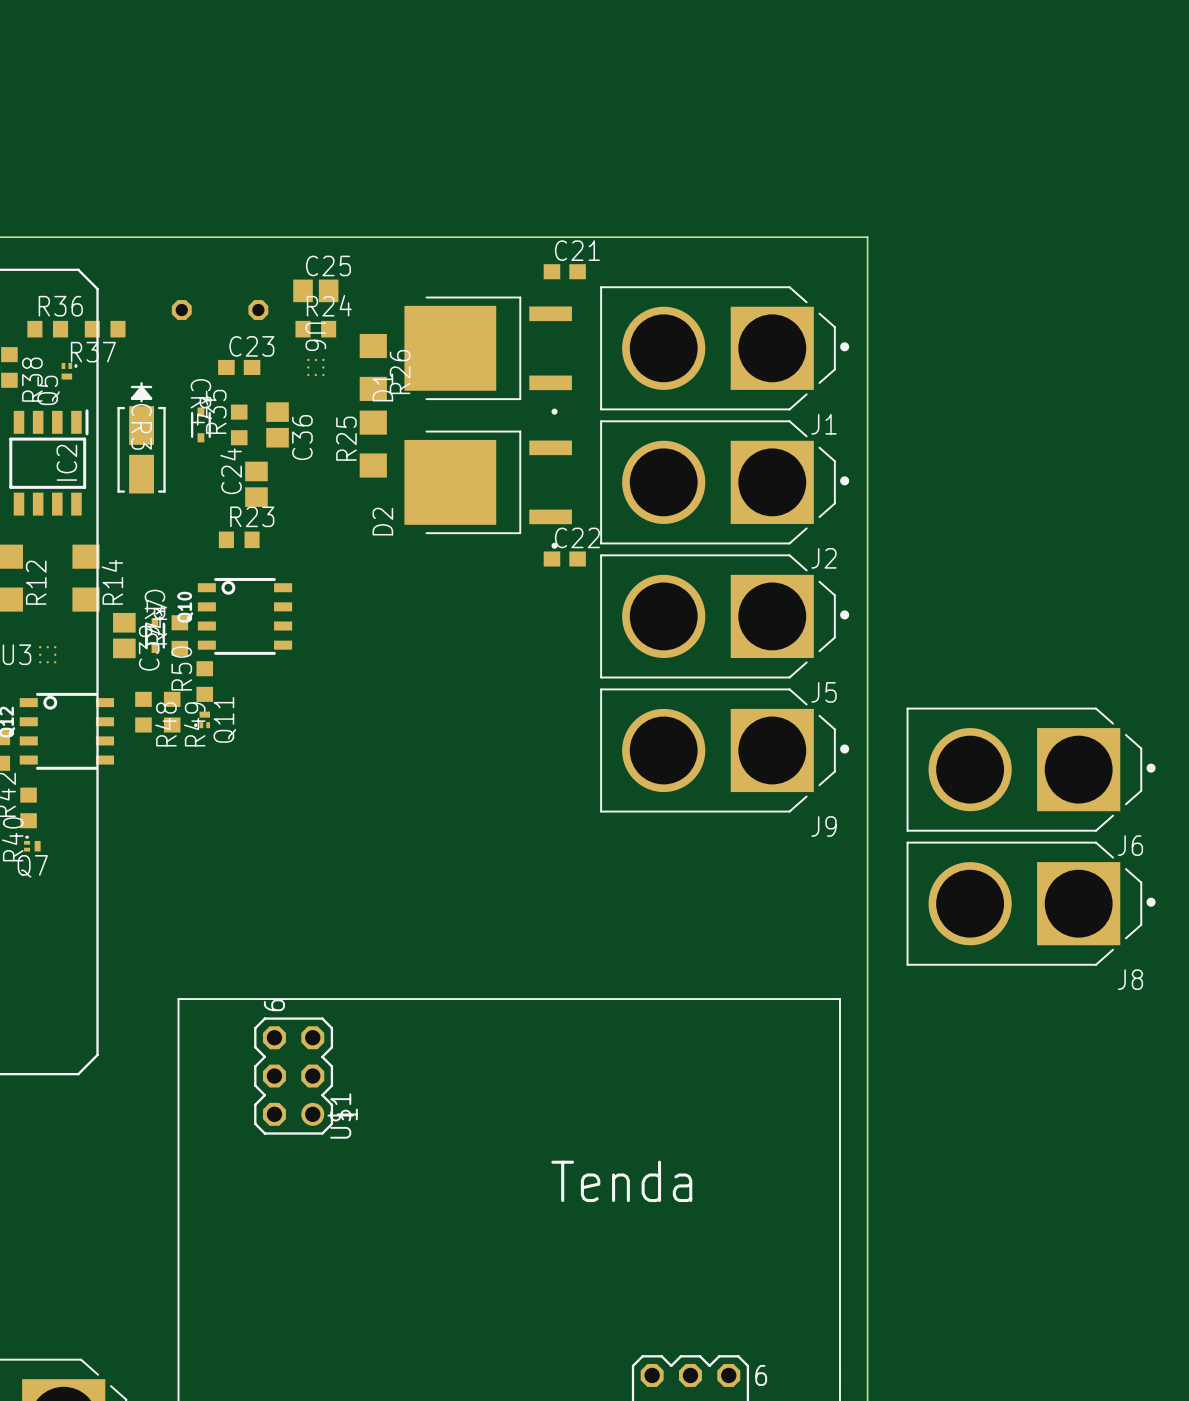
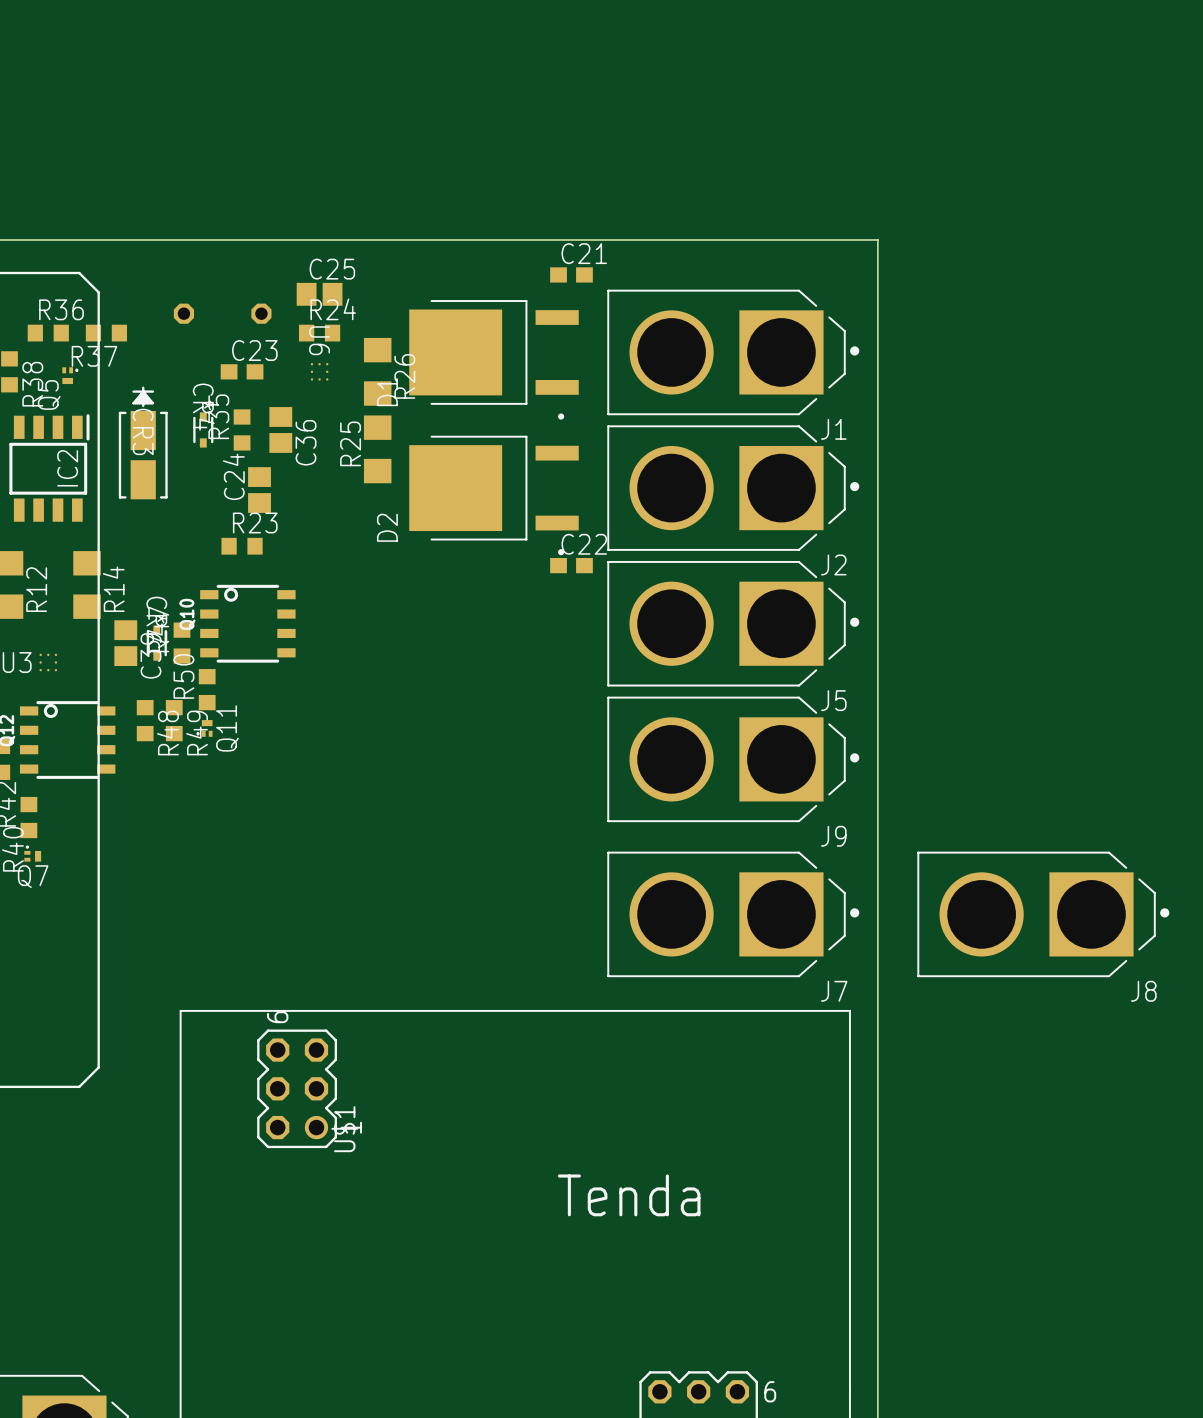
J6: (1031, 769) -> none
J7: none -> (733, 914)

